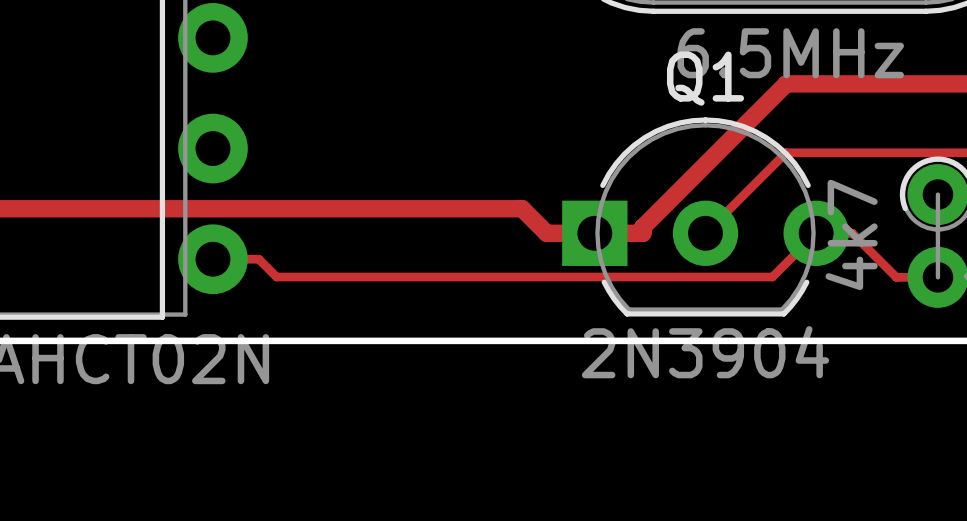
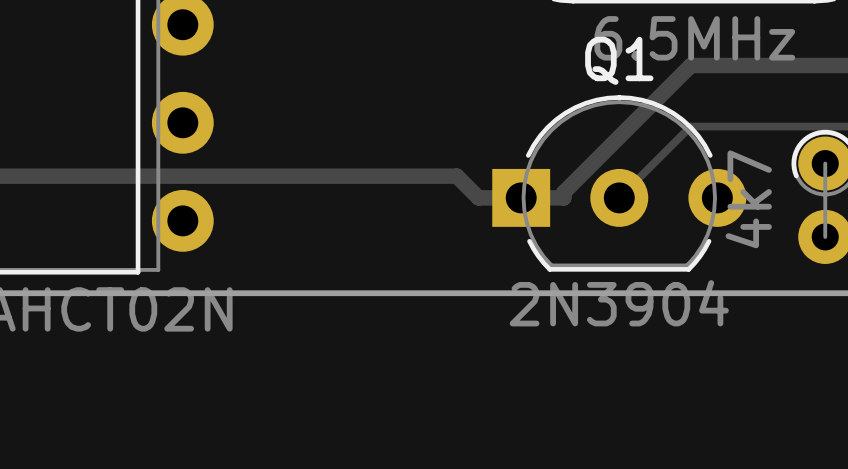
track: (212, 259) (258, 259) (276, 277) (772, 277) (816, 233) (852, 233) (896, 277) (937, 277) -> none

